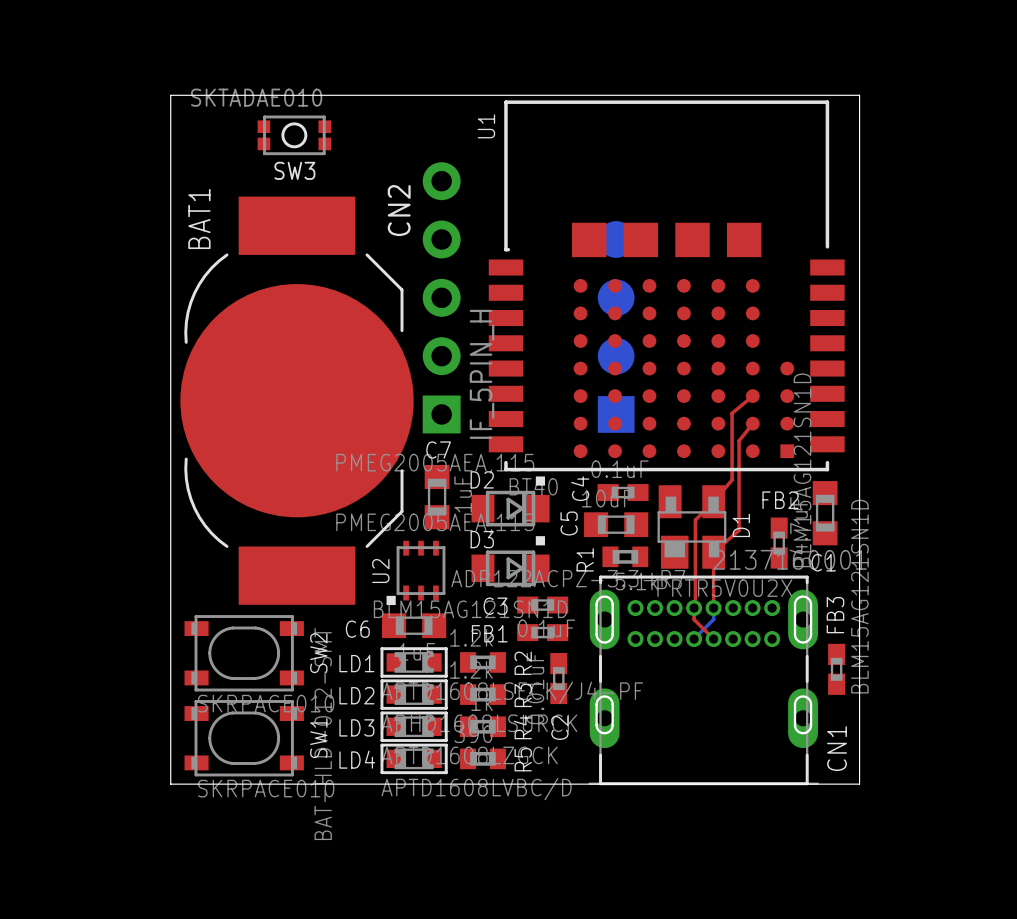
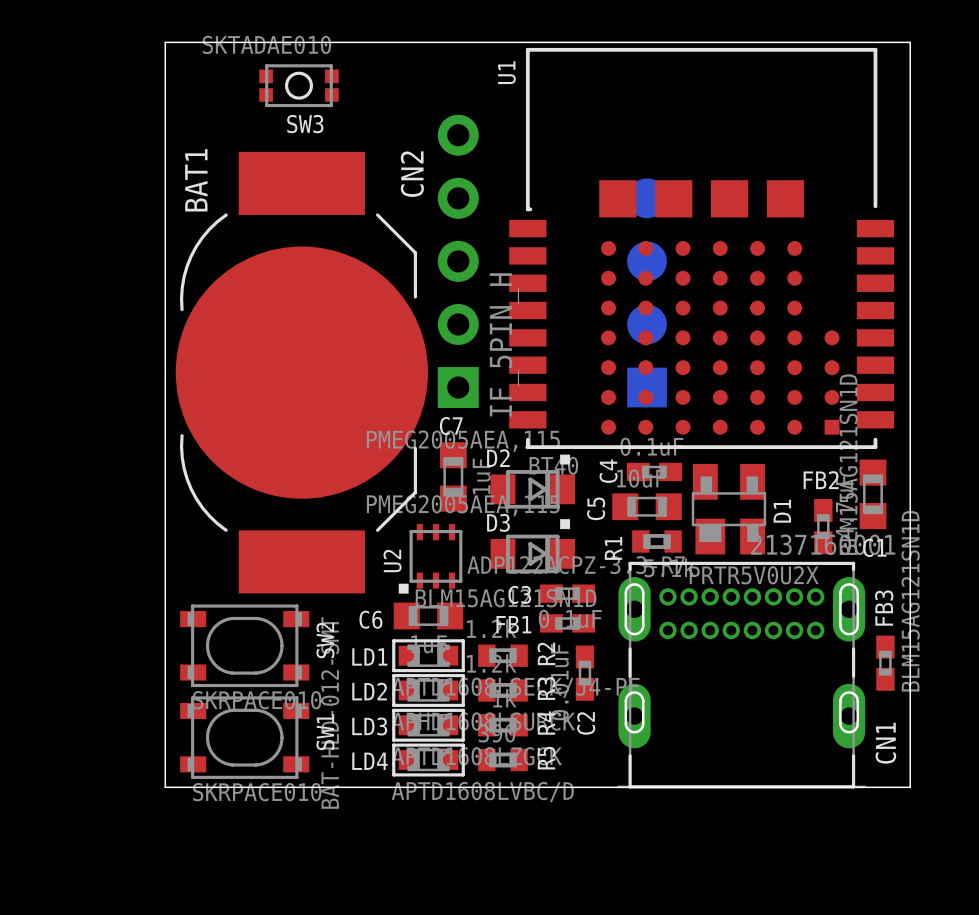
top track: (752, 396) (732, 413) (732, 479) (695, 520) (694, 619) (713, 639) -> none
top track: (752, 423) (739, 440) (739, 530) (713, 552) -> none
top track: (713, 552) (713, 608) -> none
bottom track: (713, 608) (713, 619) (694, 639) -> none

